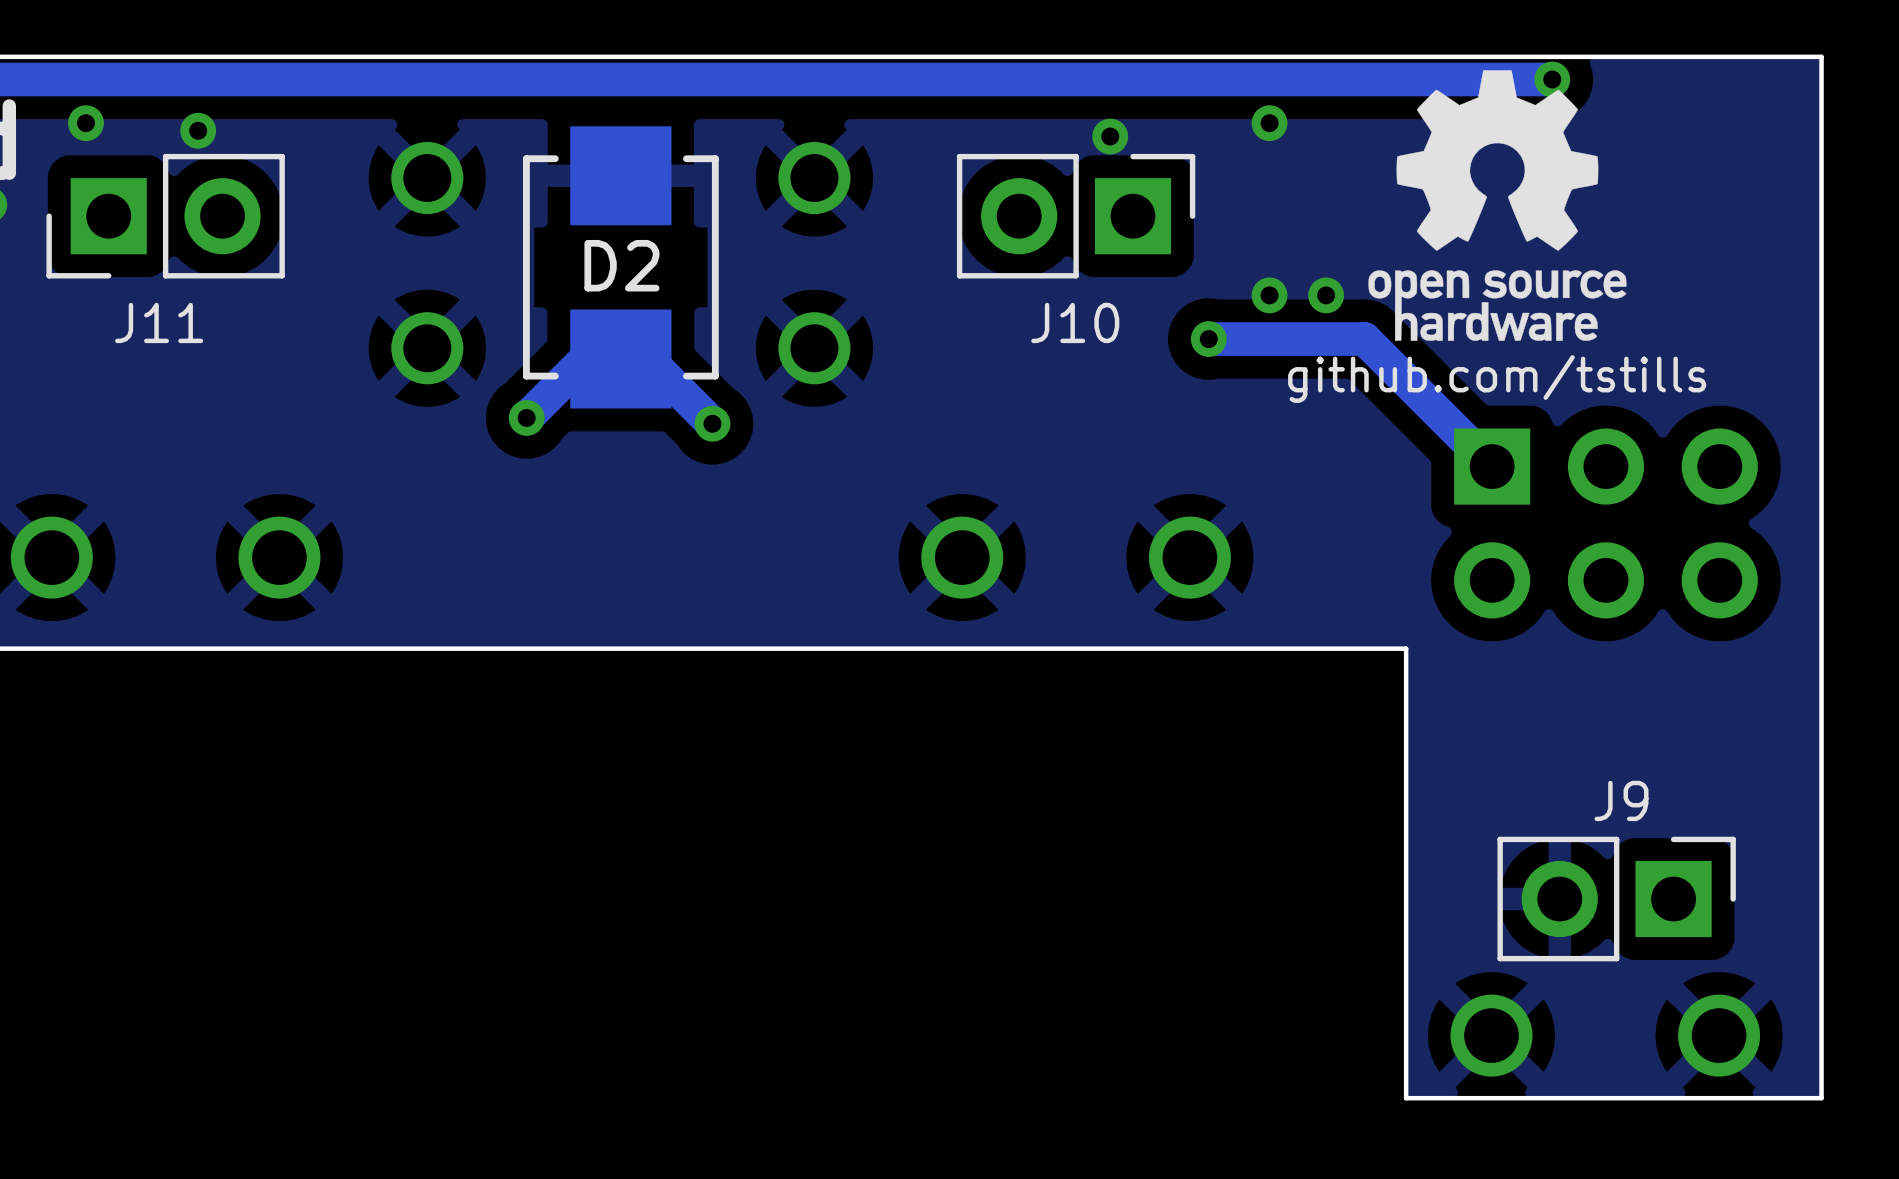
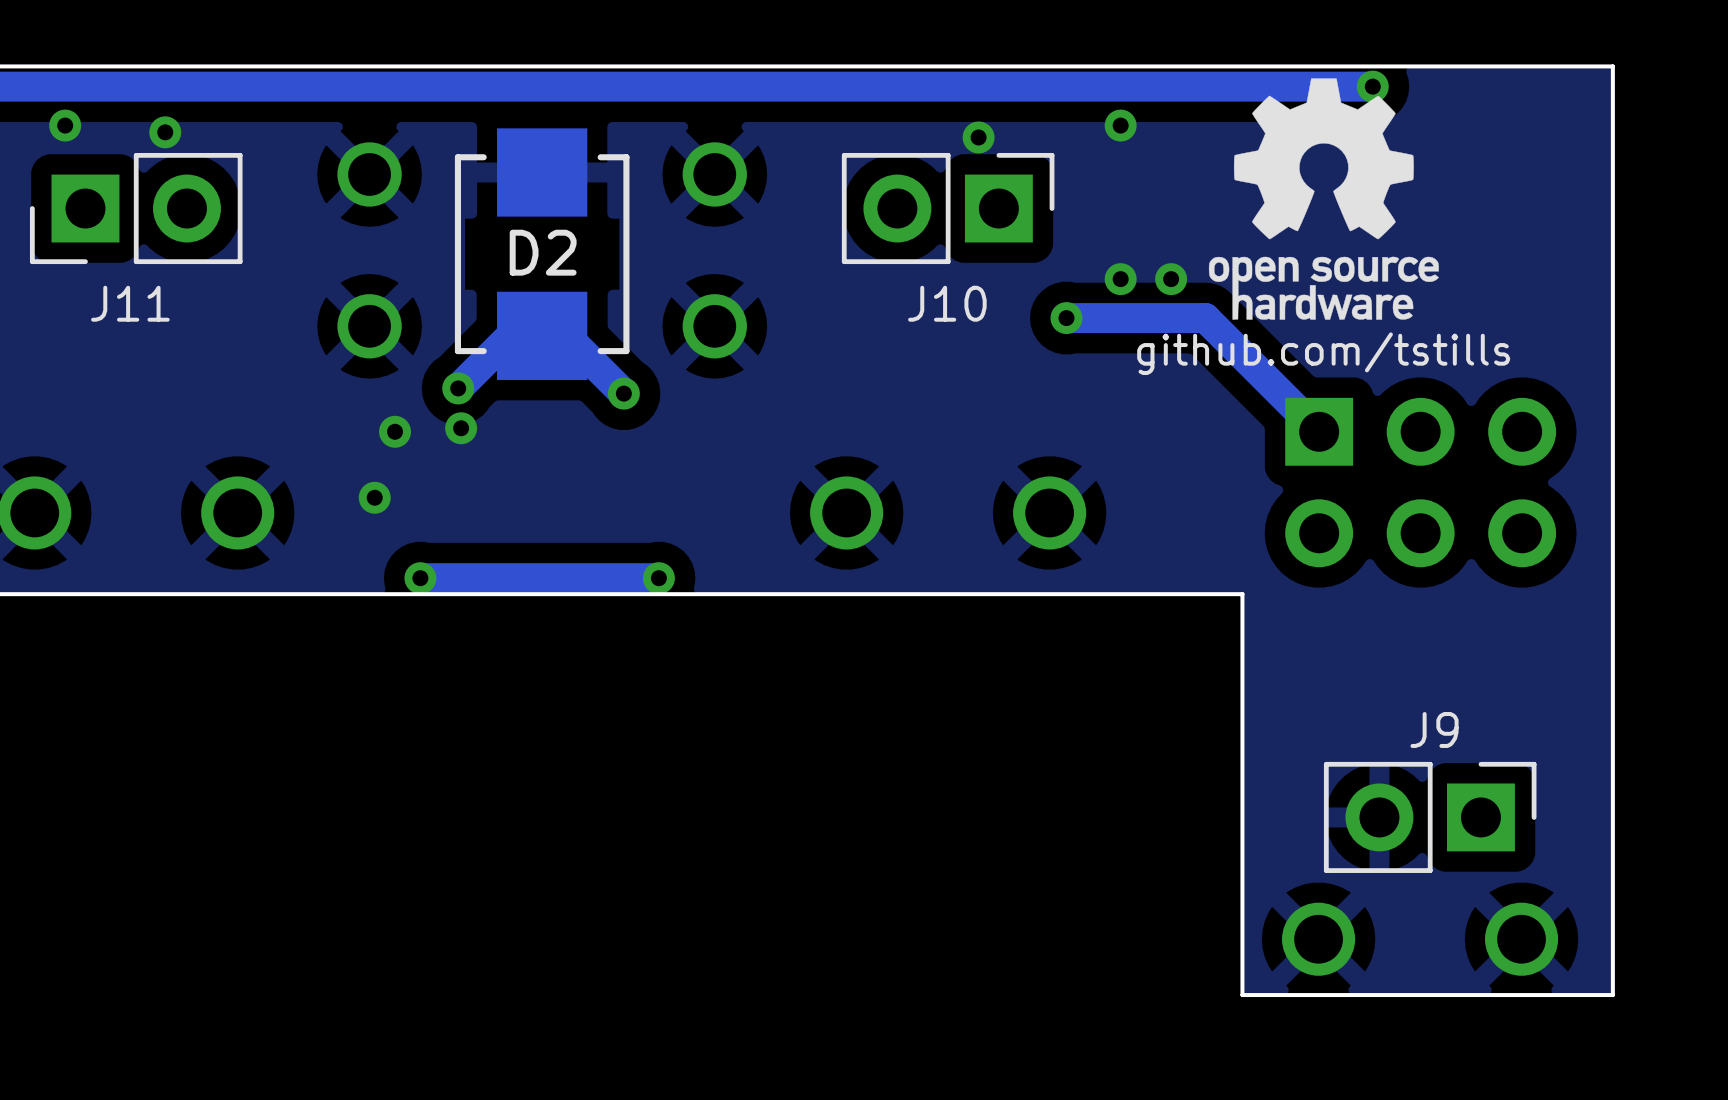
via: none -> (461, 428)
via: none -> (395, 431)
via: none -> (374, 497)
via: none -> (420, 578)
track: none -> (658, 578) (420, 578)
via: none -> (658, 578)

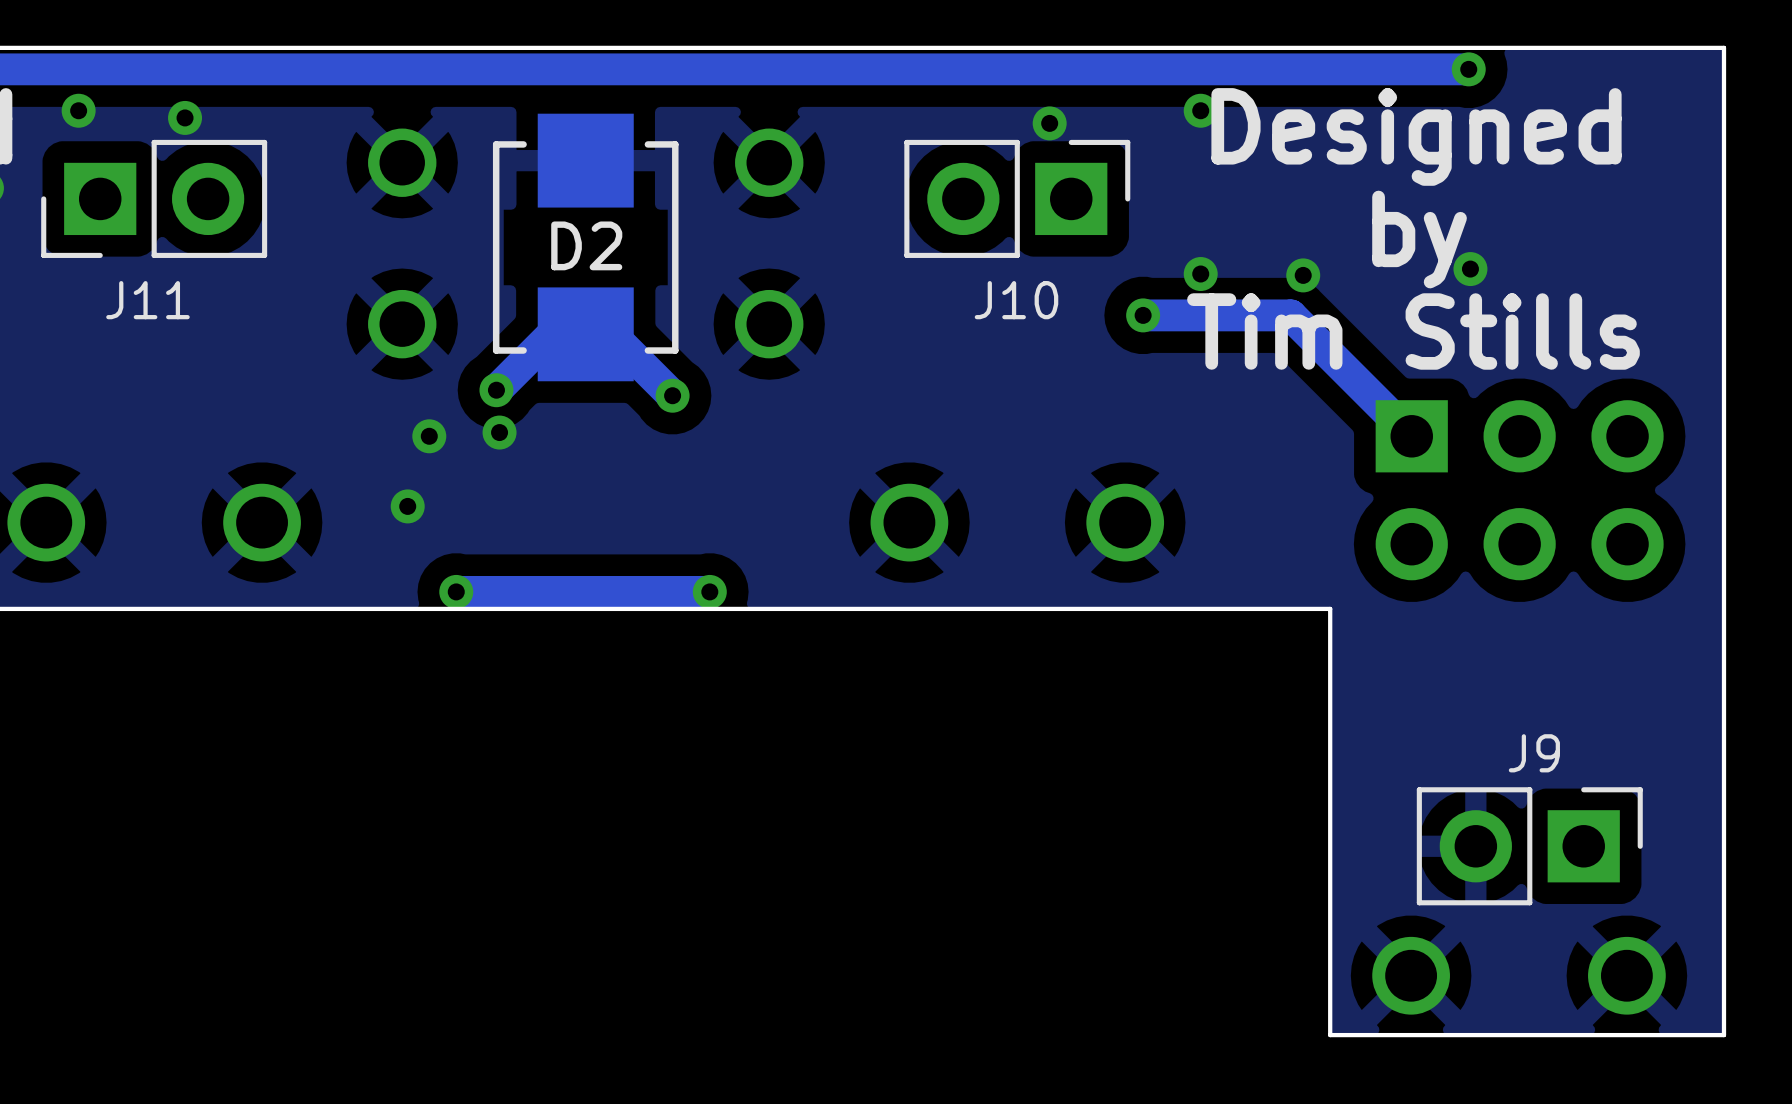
drawing: [1208, 78, 1439, 320] -> none
text: none -> Designed (1416, 136)
text: none -> by (1419, 239)
via: none -> (1470, 269)
via position: (1171, 279) -> (1303, 275)
text: github.com/tstills (1323, 353) -> Tim Stills (1413, 331)

